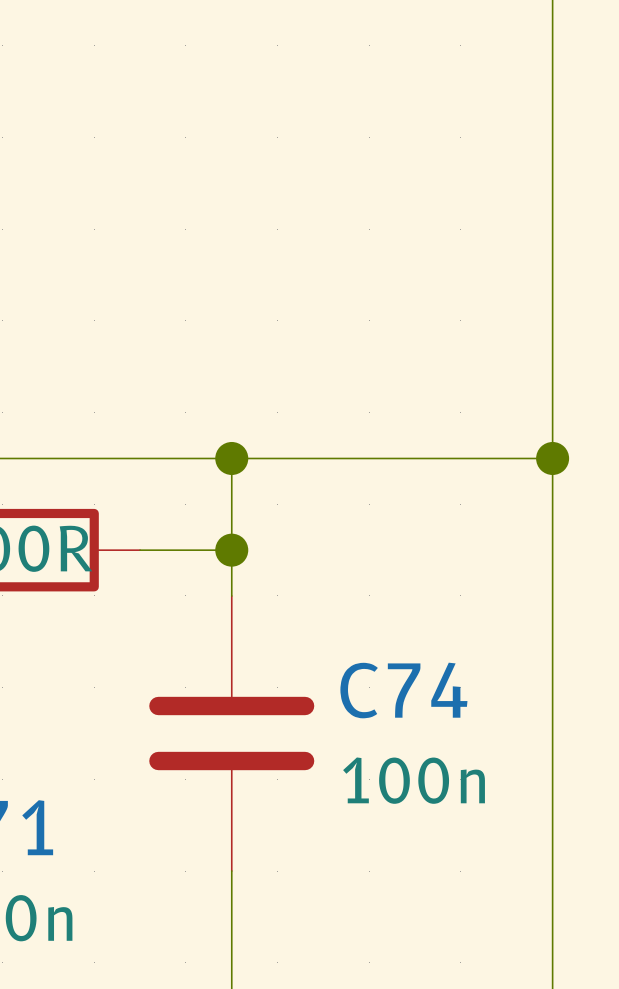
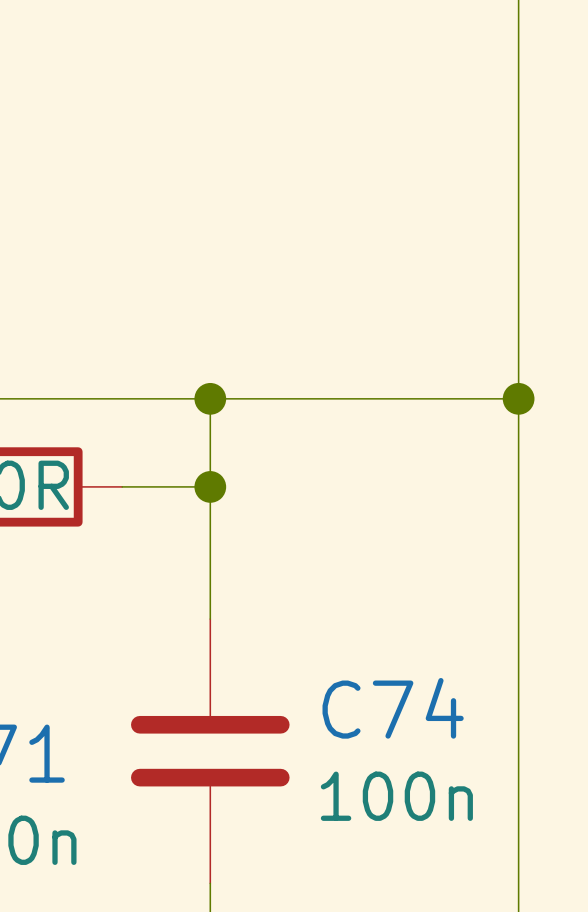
C74 position: (231, 733) -> (210, 751)

